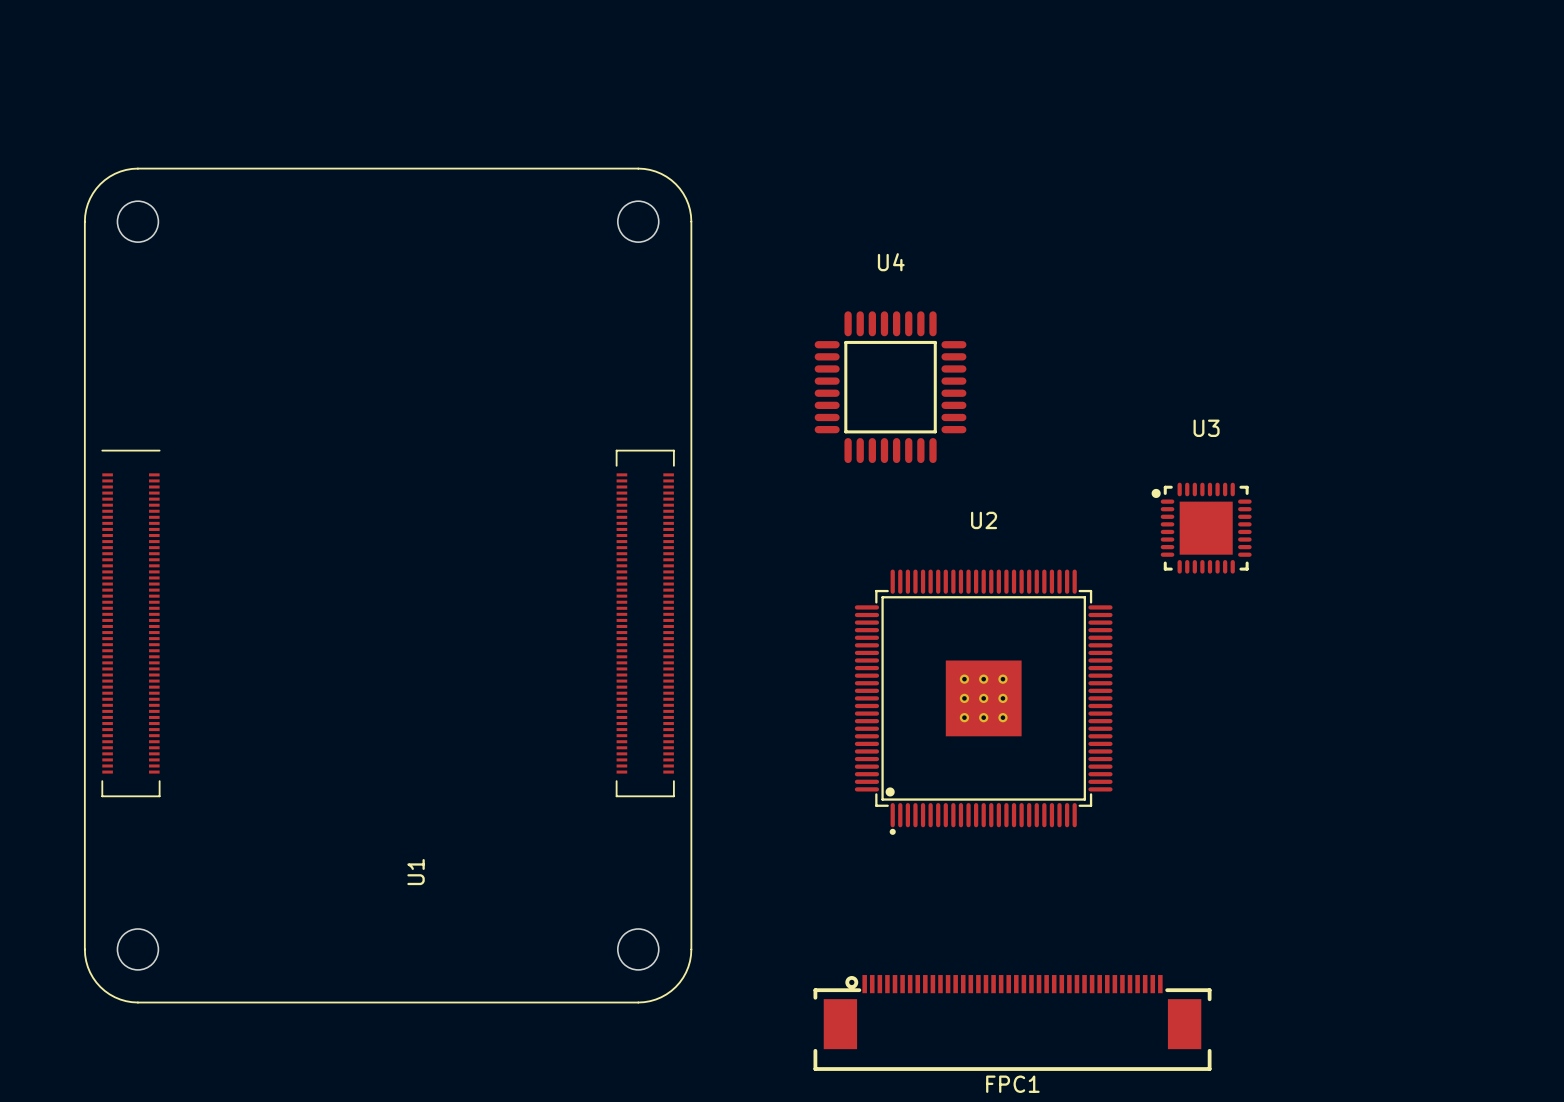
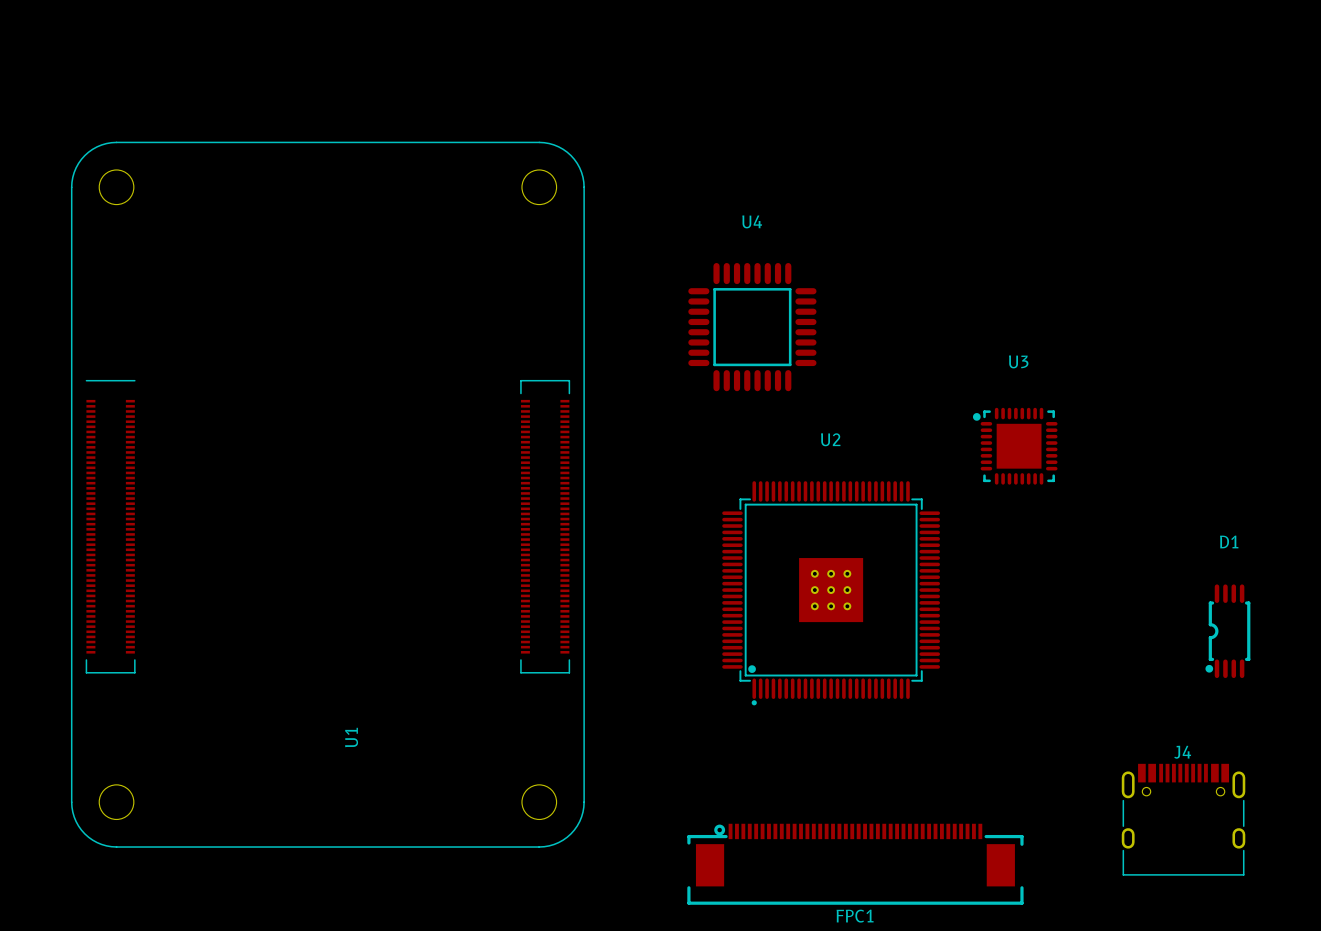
D1: none -> (1227, 631)
J4: none -> (1183, 819)

